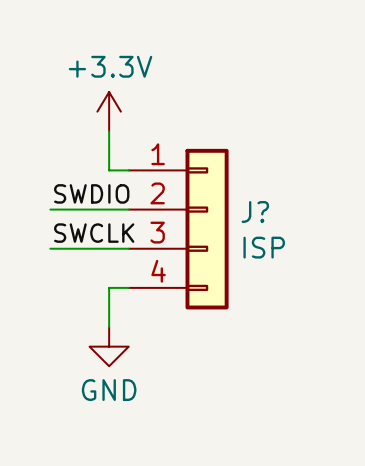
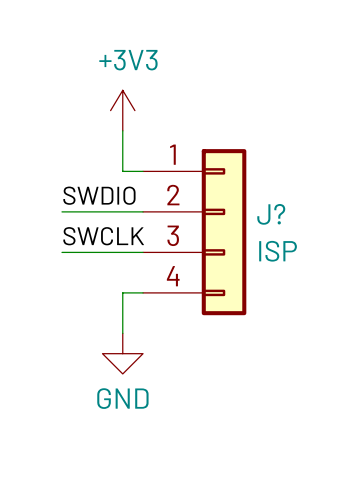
power symbol: +3.3V (109, 111) -> +3V3 (122, 110)

